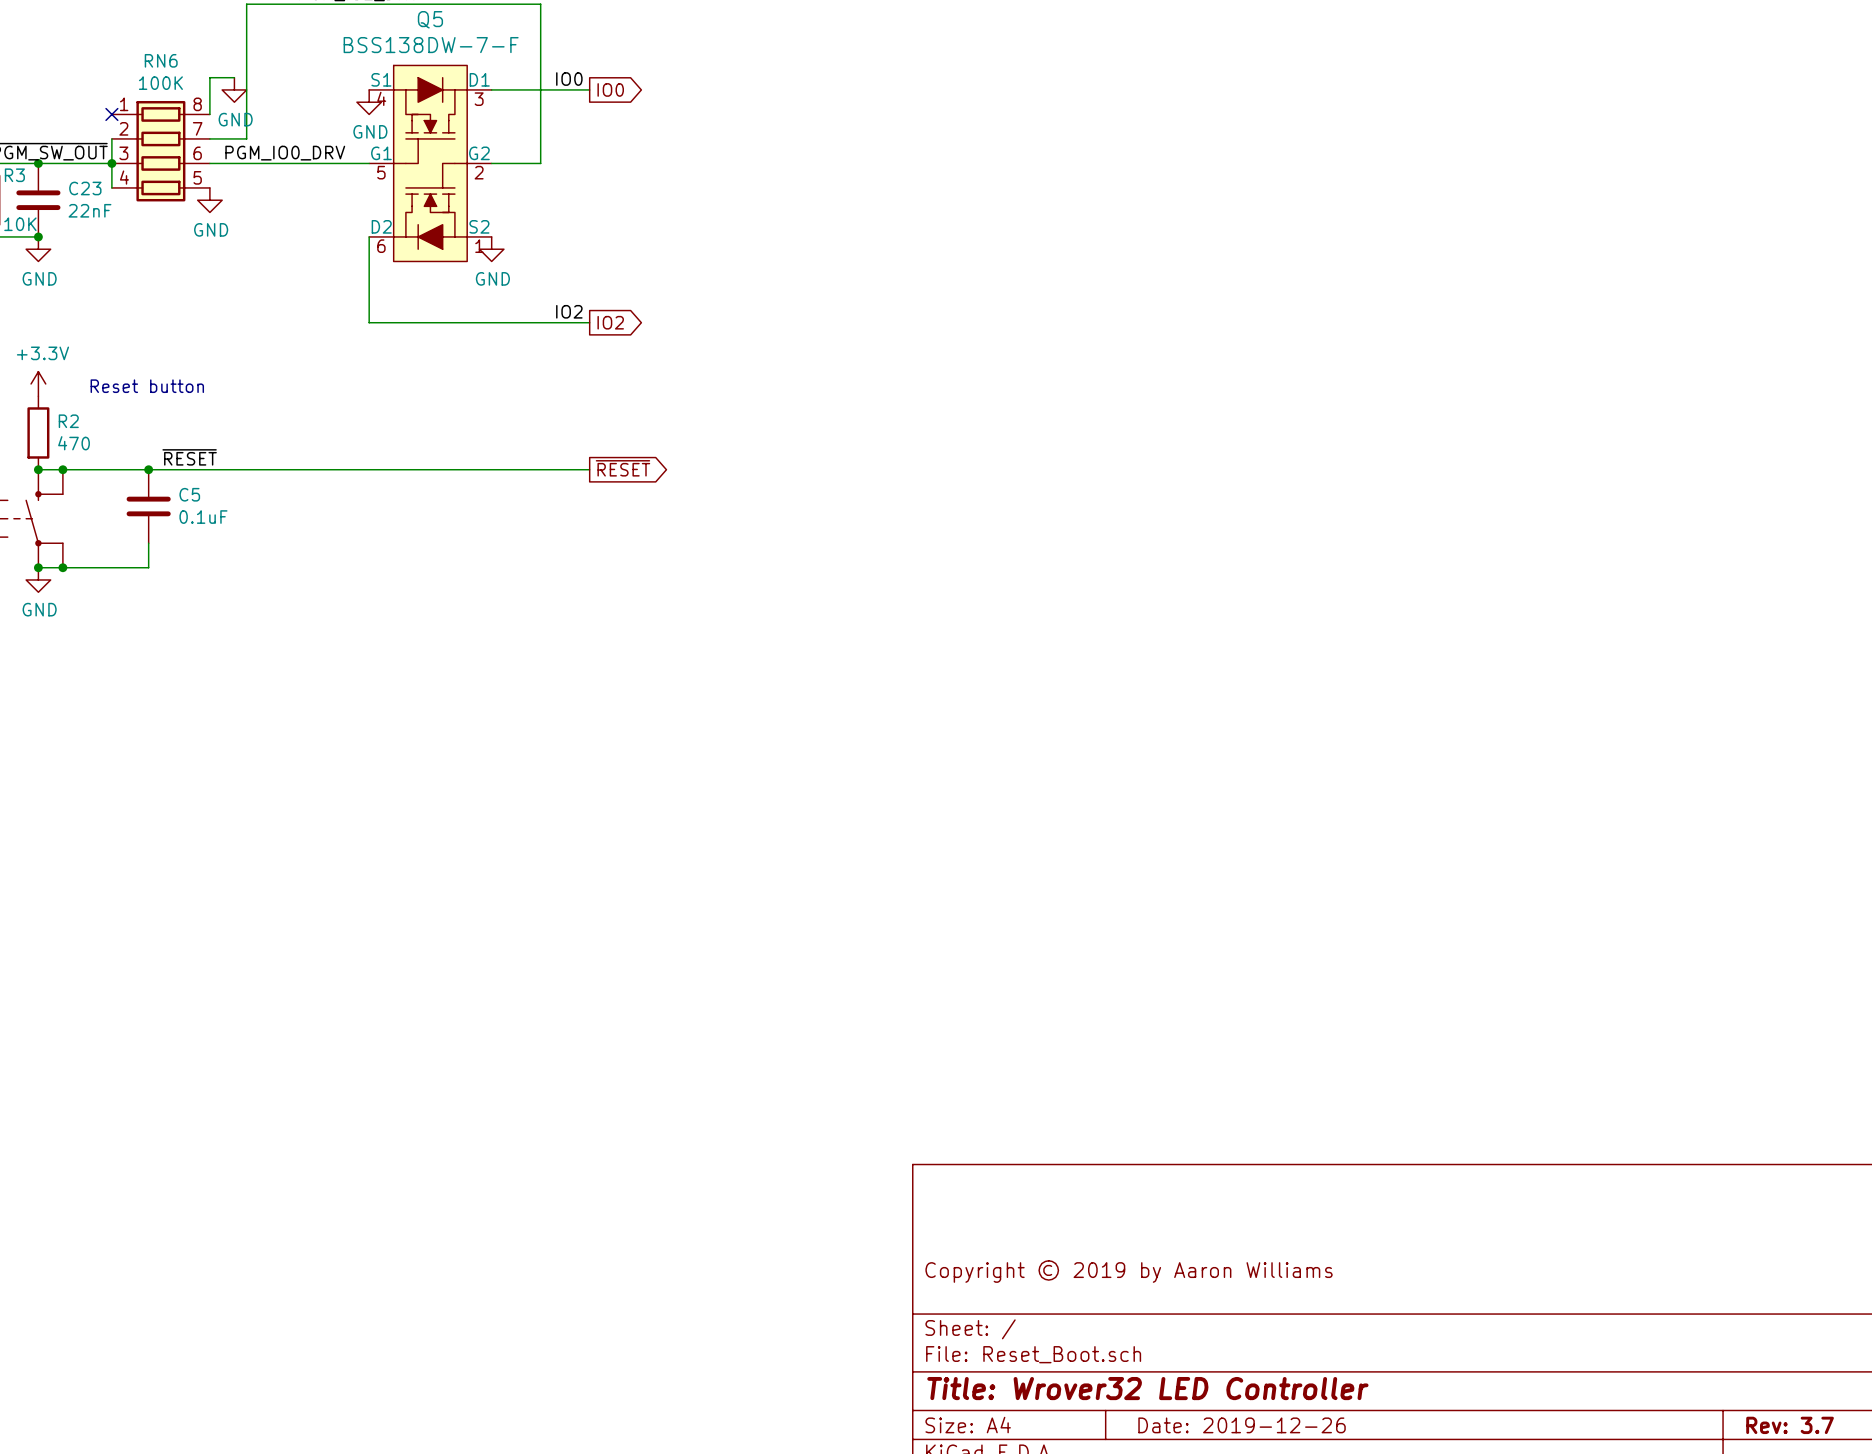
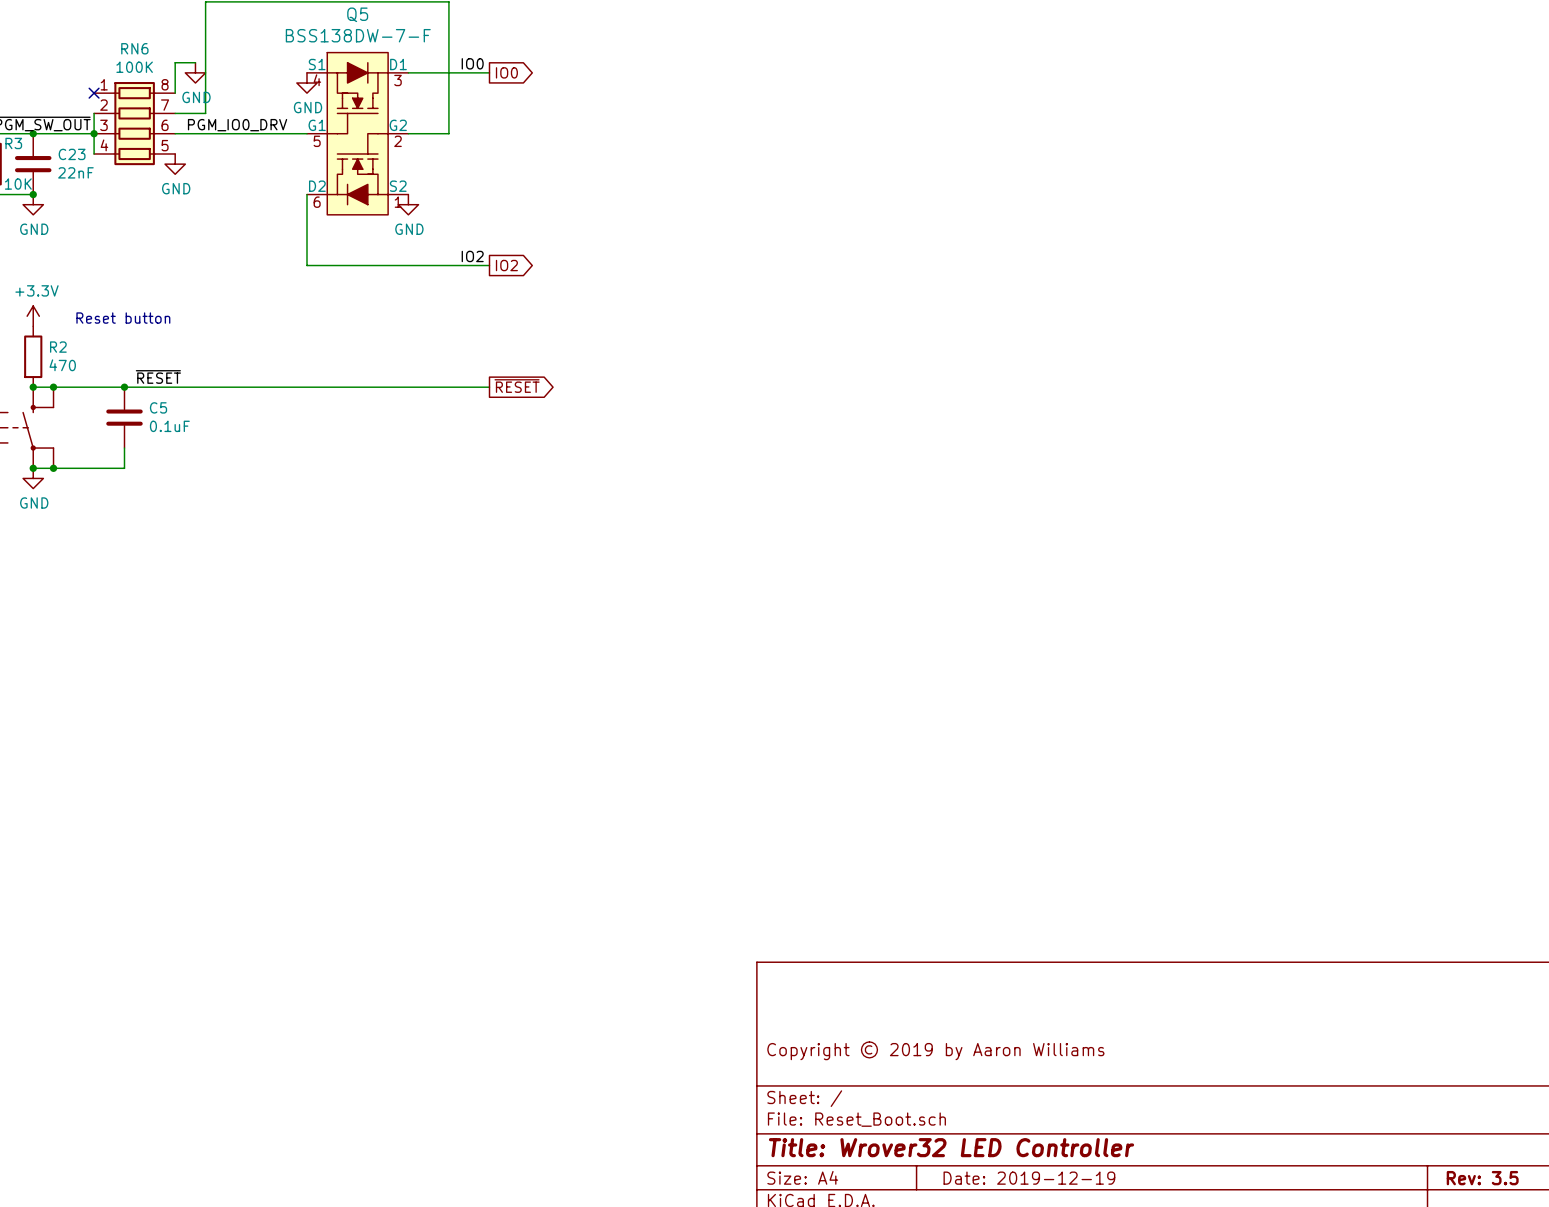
title block: Date: 2019-12-26 (1242, 1425) -> Date: 2019-12-19 (1029, 1178)
title block: Rev: 3.7 (1790, 1425) -> Rev: 3.5 (1482, 1178)

